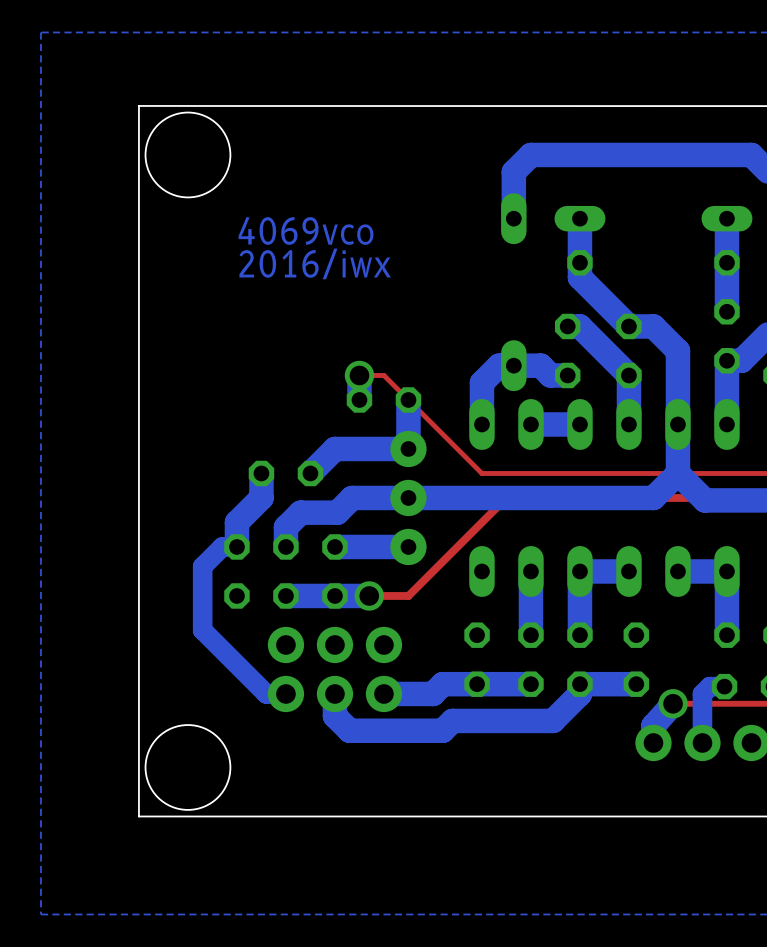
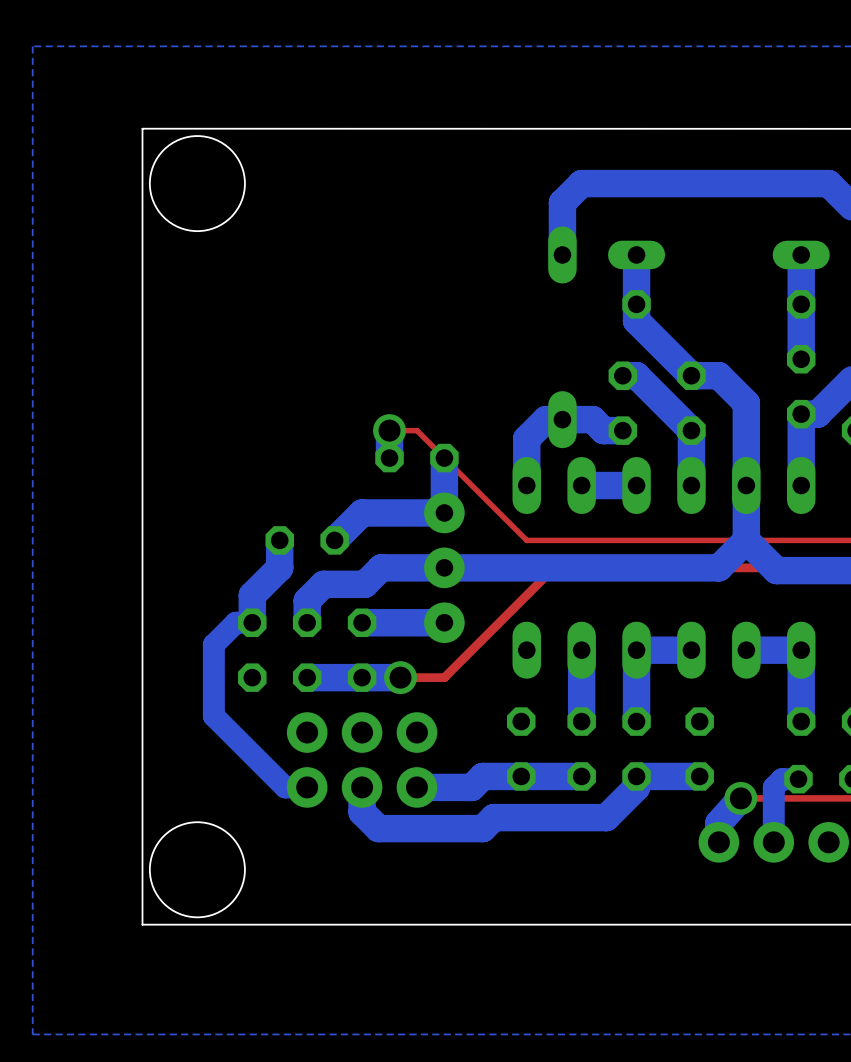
text: 4069vco (306, 231) -> none
text: 2016/iwx (315, 263) -> none

